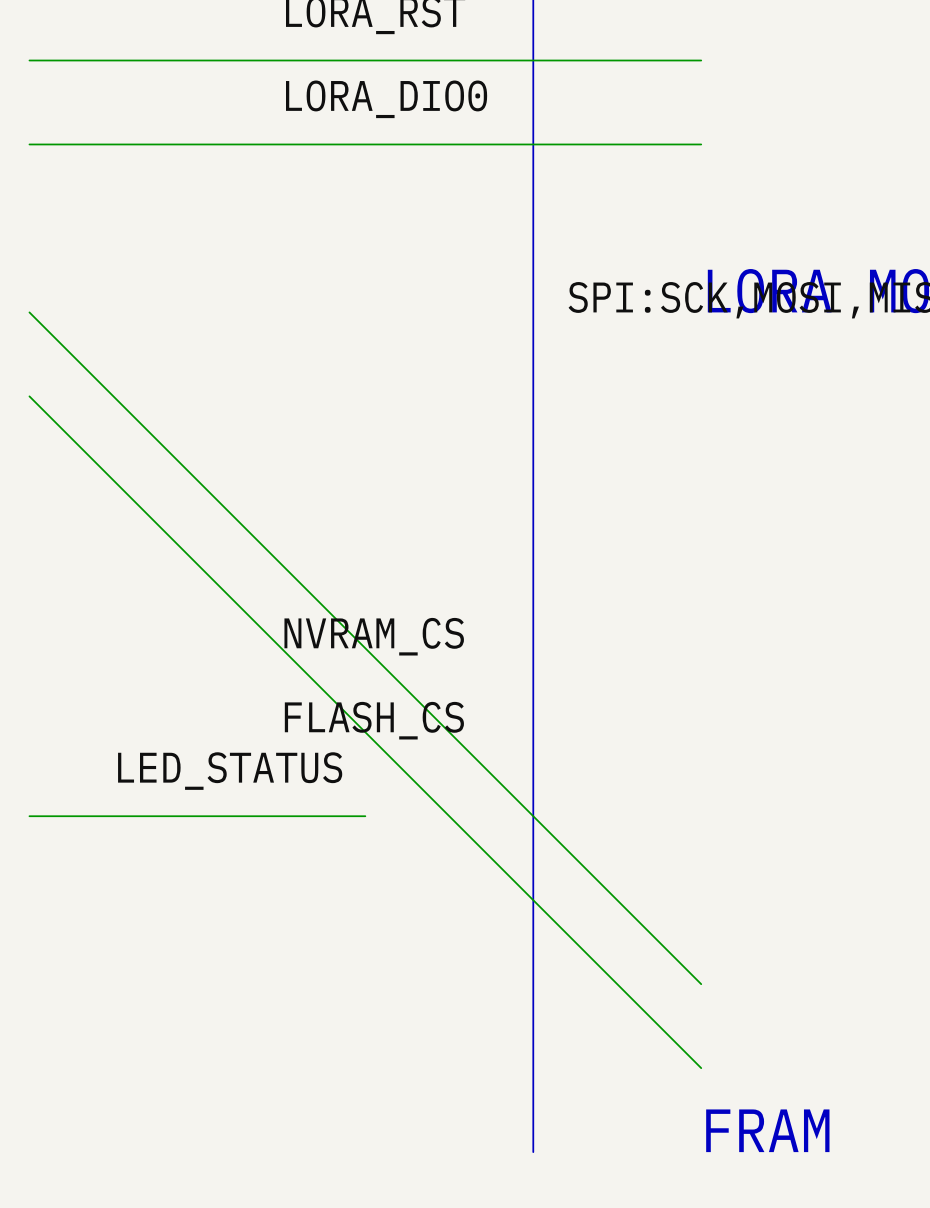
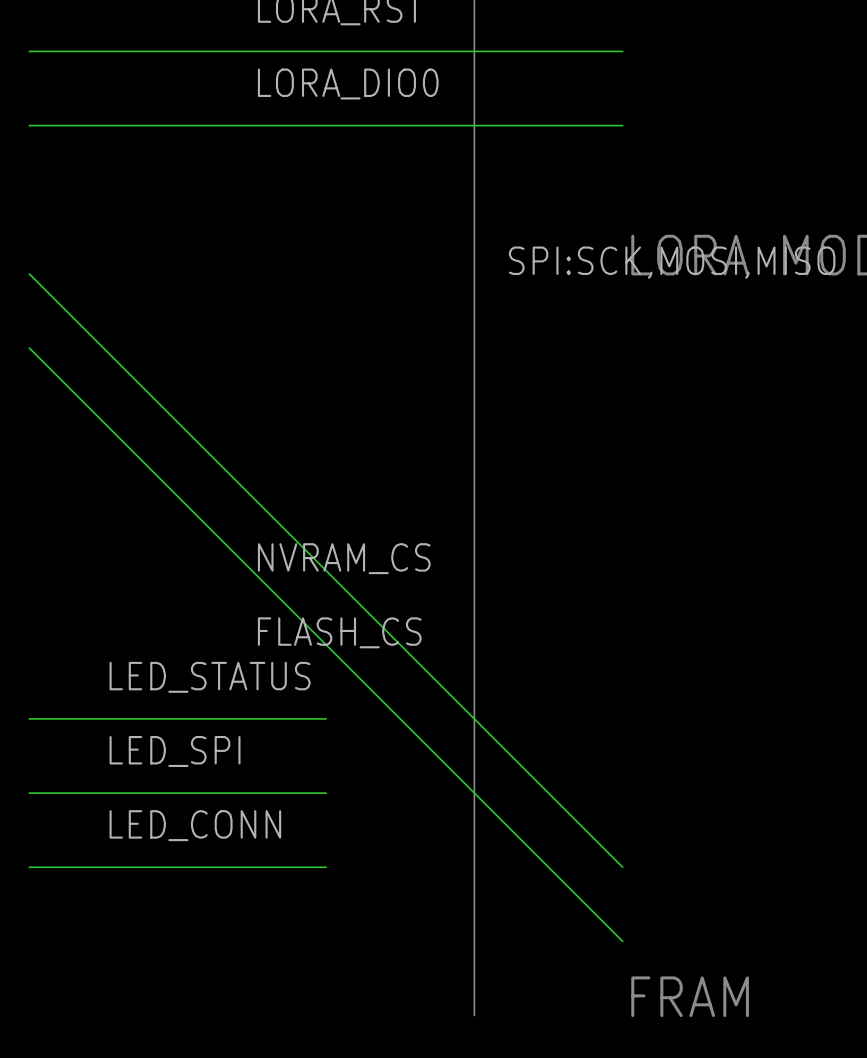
label: none -> LED_SPI (175, 751)
wire: none -> (29, 793) (326, 793)
label: none -> LED_CONN (195, 825)
wire: none -> (29, 867) (326, 867)

